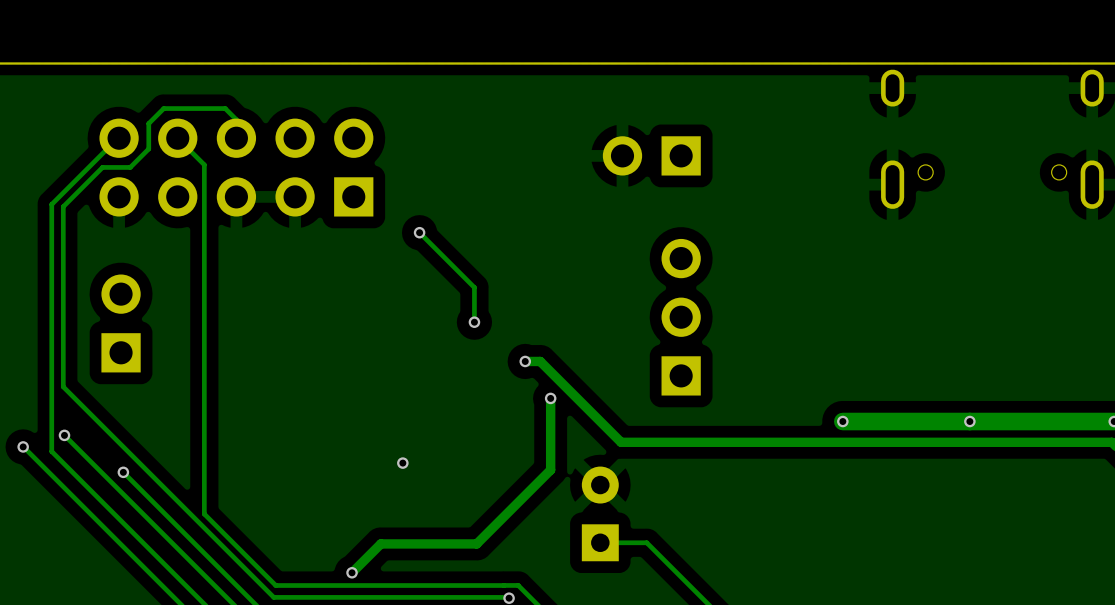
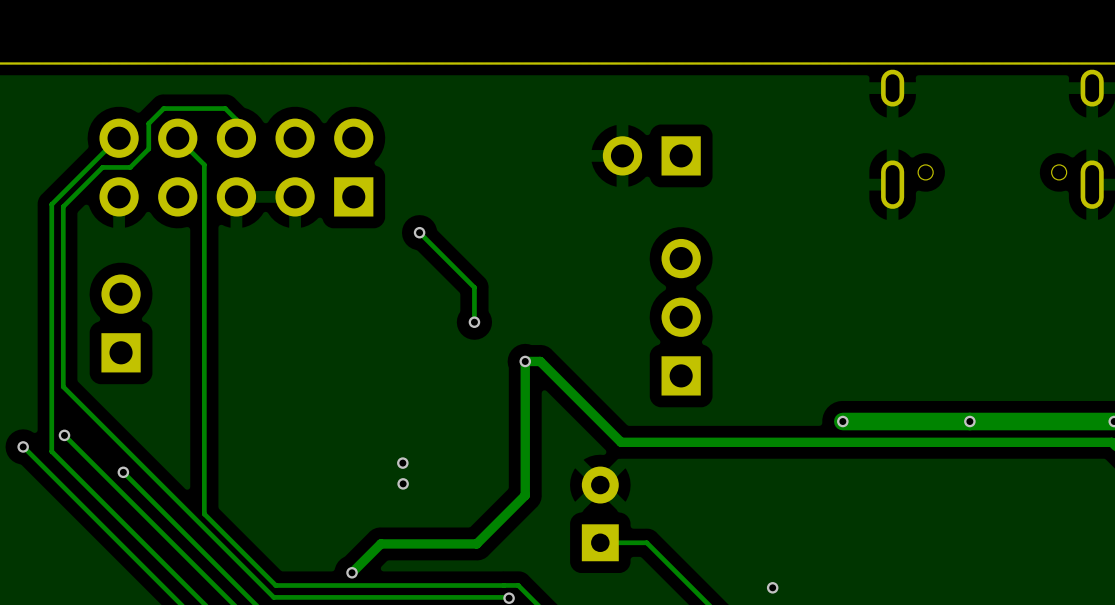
track: (550, 398) (550, 470) (525, 495) -> (525, 361) (525, 495)
via: (550, 398) -> none
via: none -> (403, 483)
via: none -> (772, 587)

